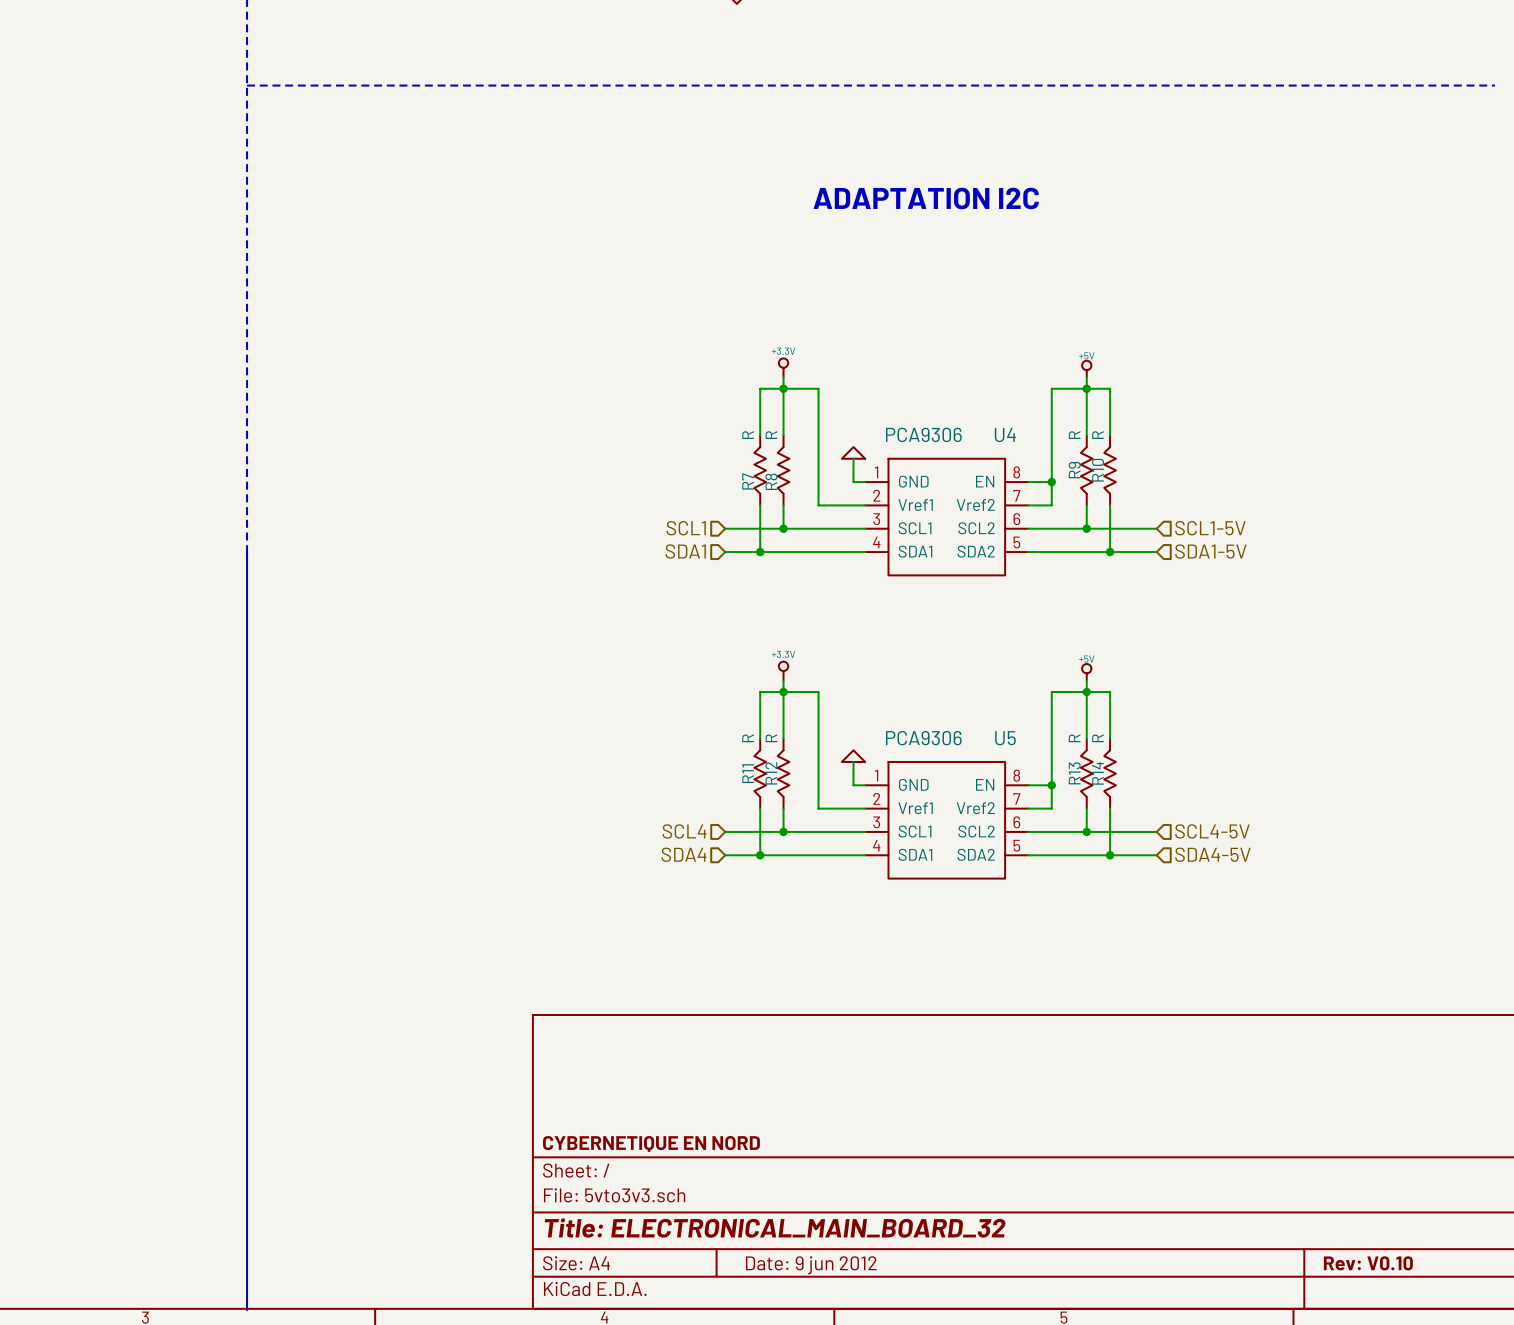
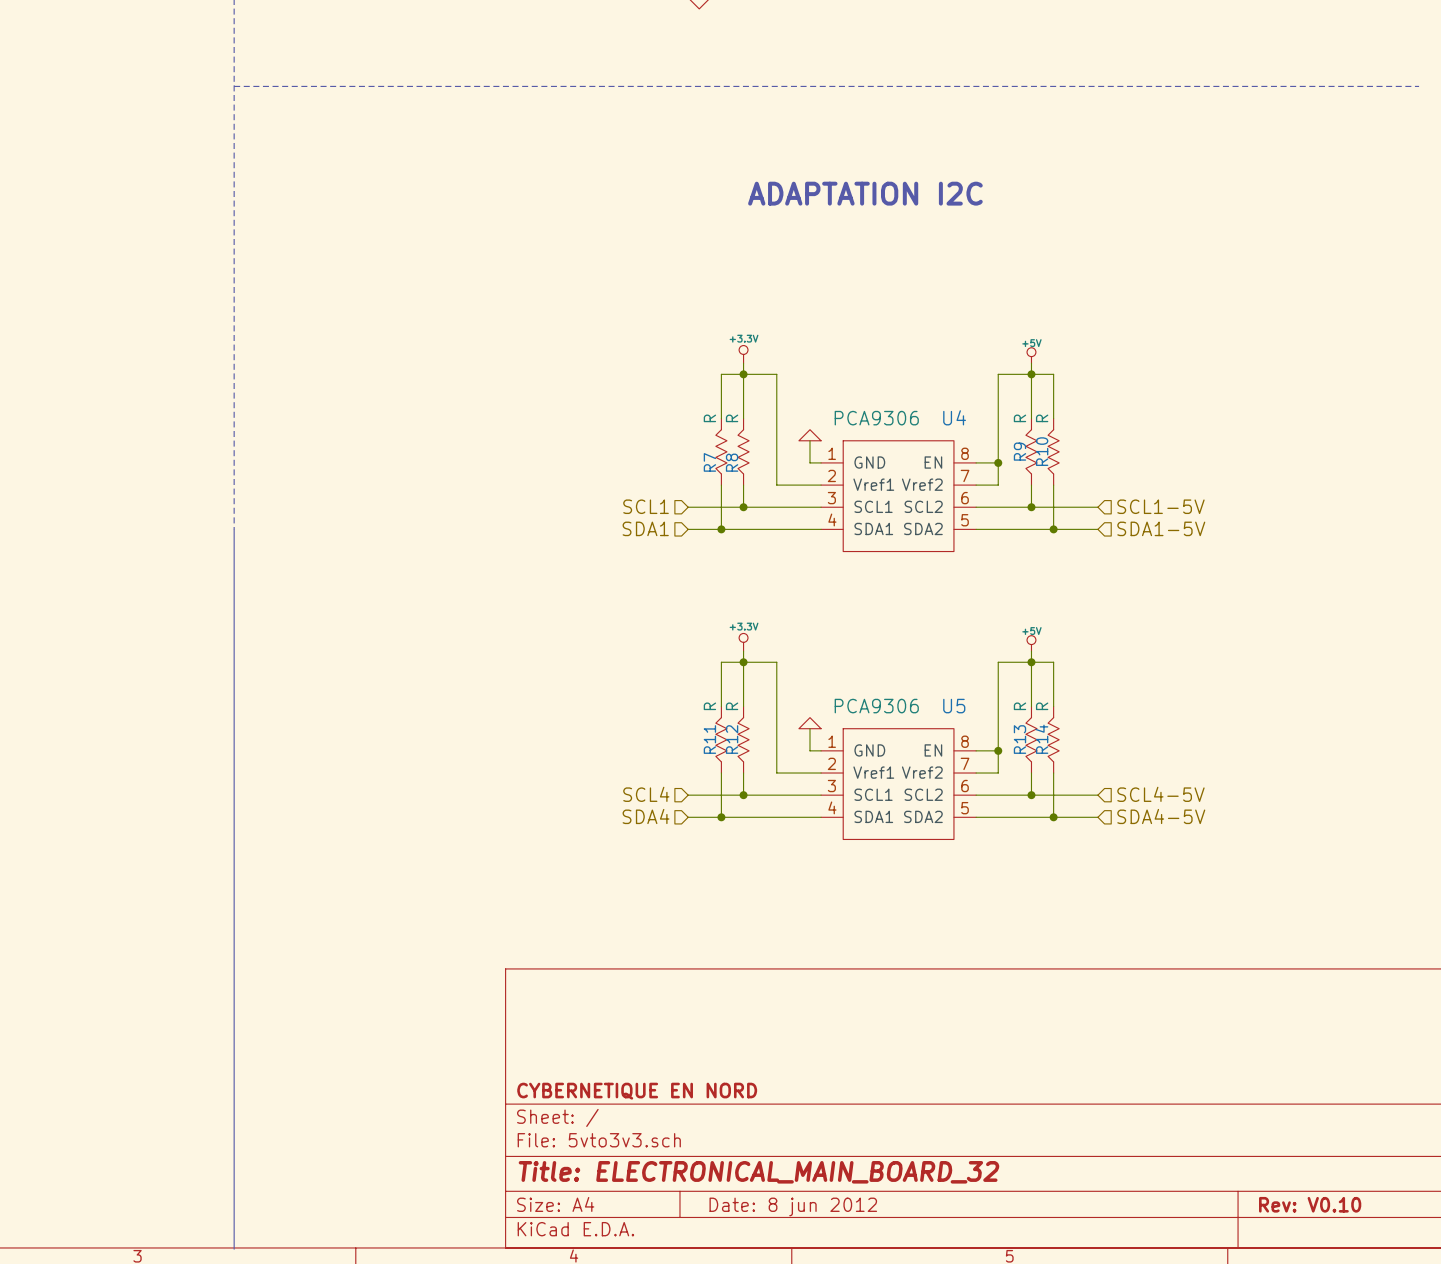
title block: Date: 9 jun 2012 (811, 1265) -> Date: 8 jun 2012 (793, 1206)

